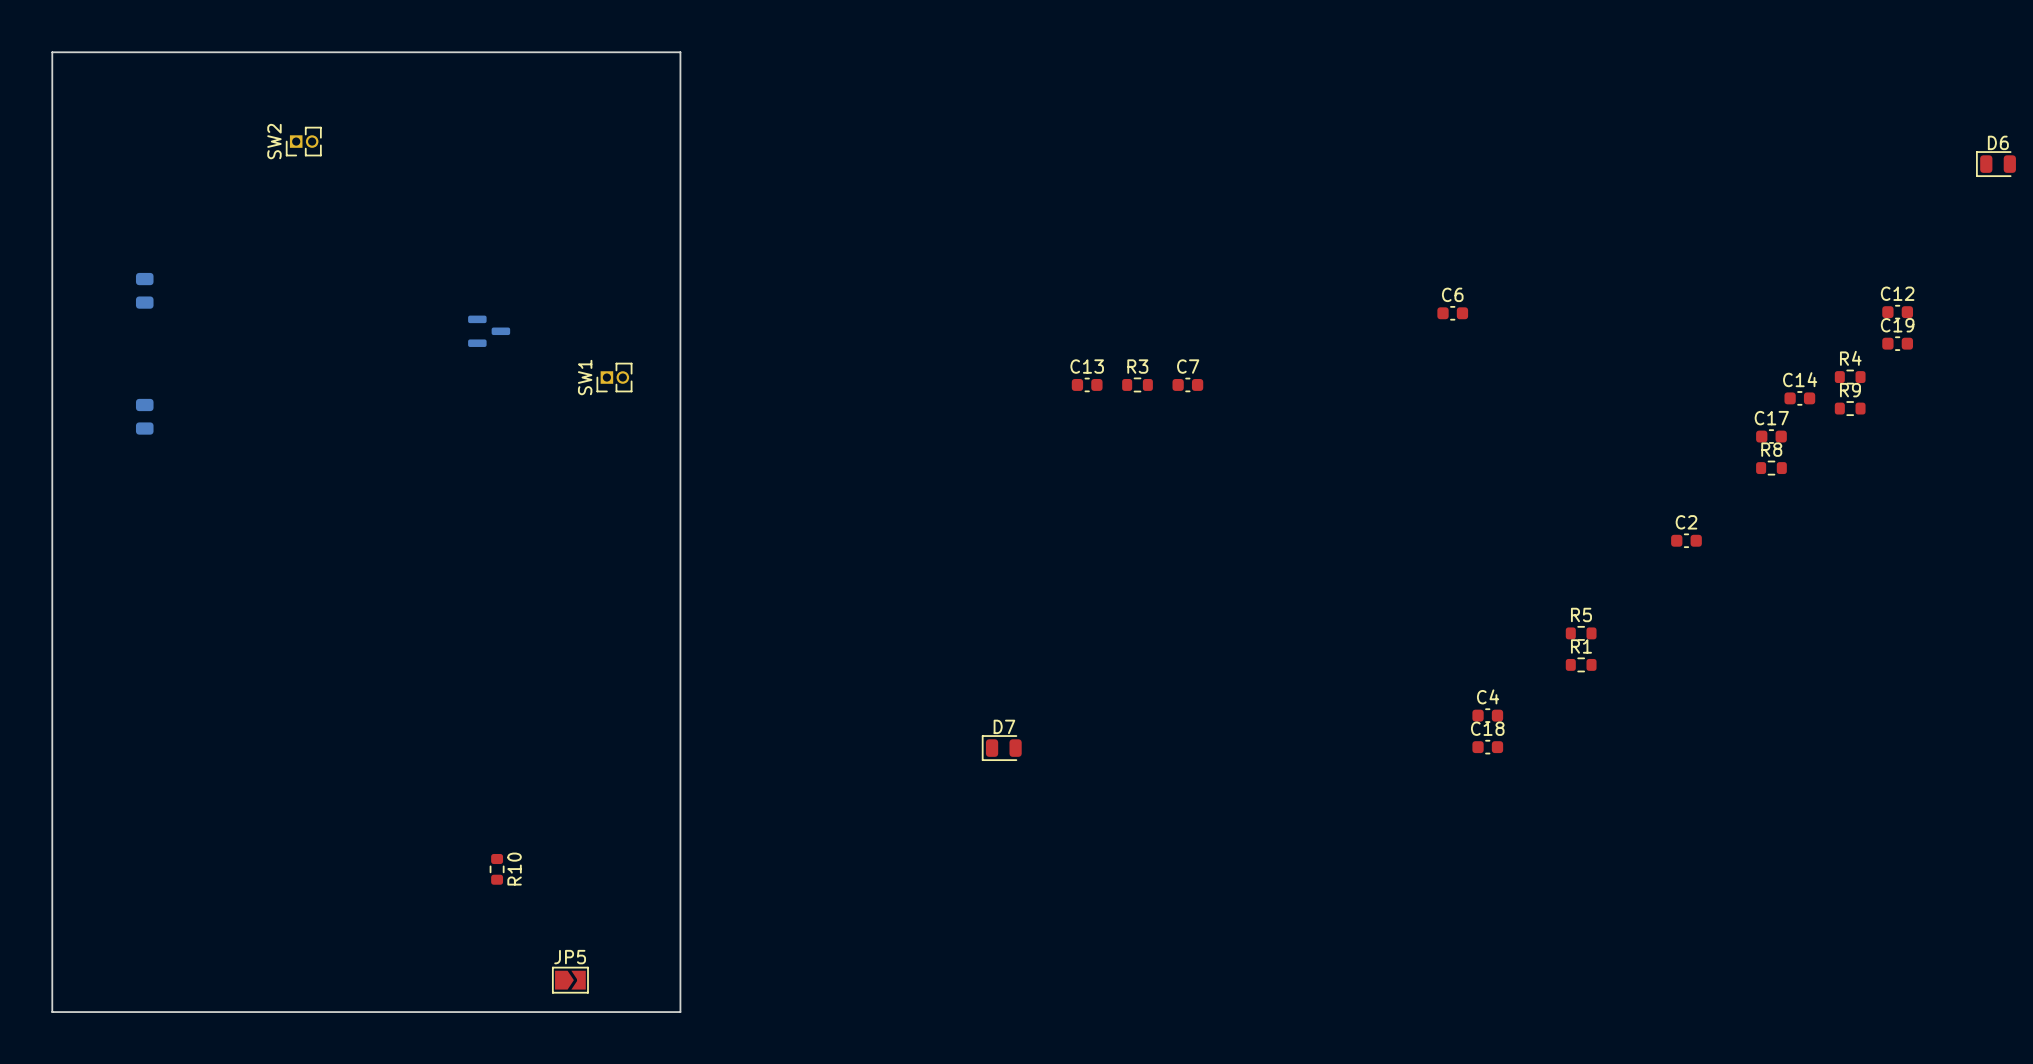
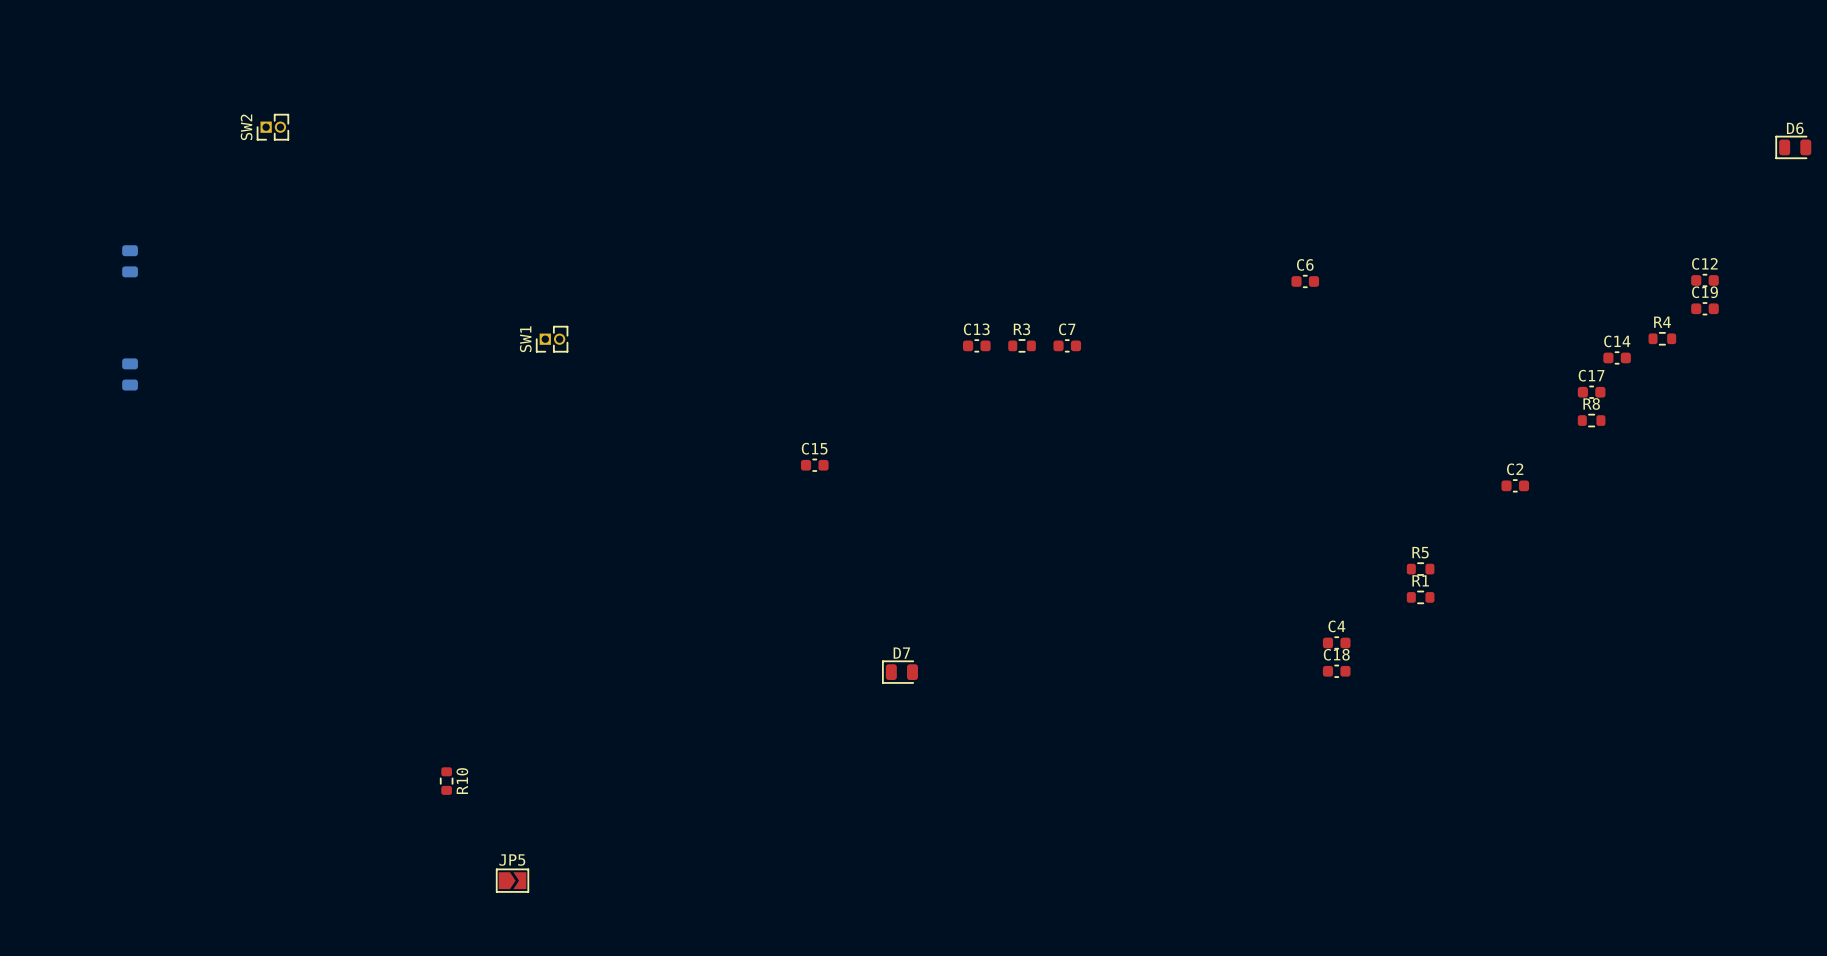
board edge: (52, 52) (52, 1012) (680, 1012) (680, 52) (52, 52) -> none
part: (489, 331) -> none
R9: (1850, 408) -> none
C15: none -> (814, 465)

